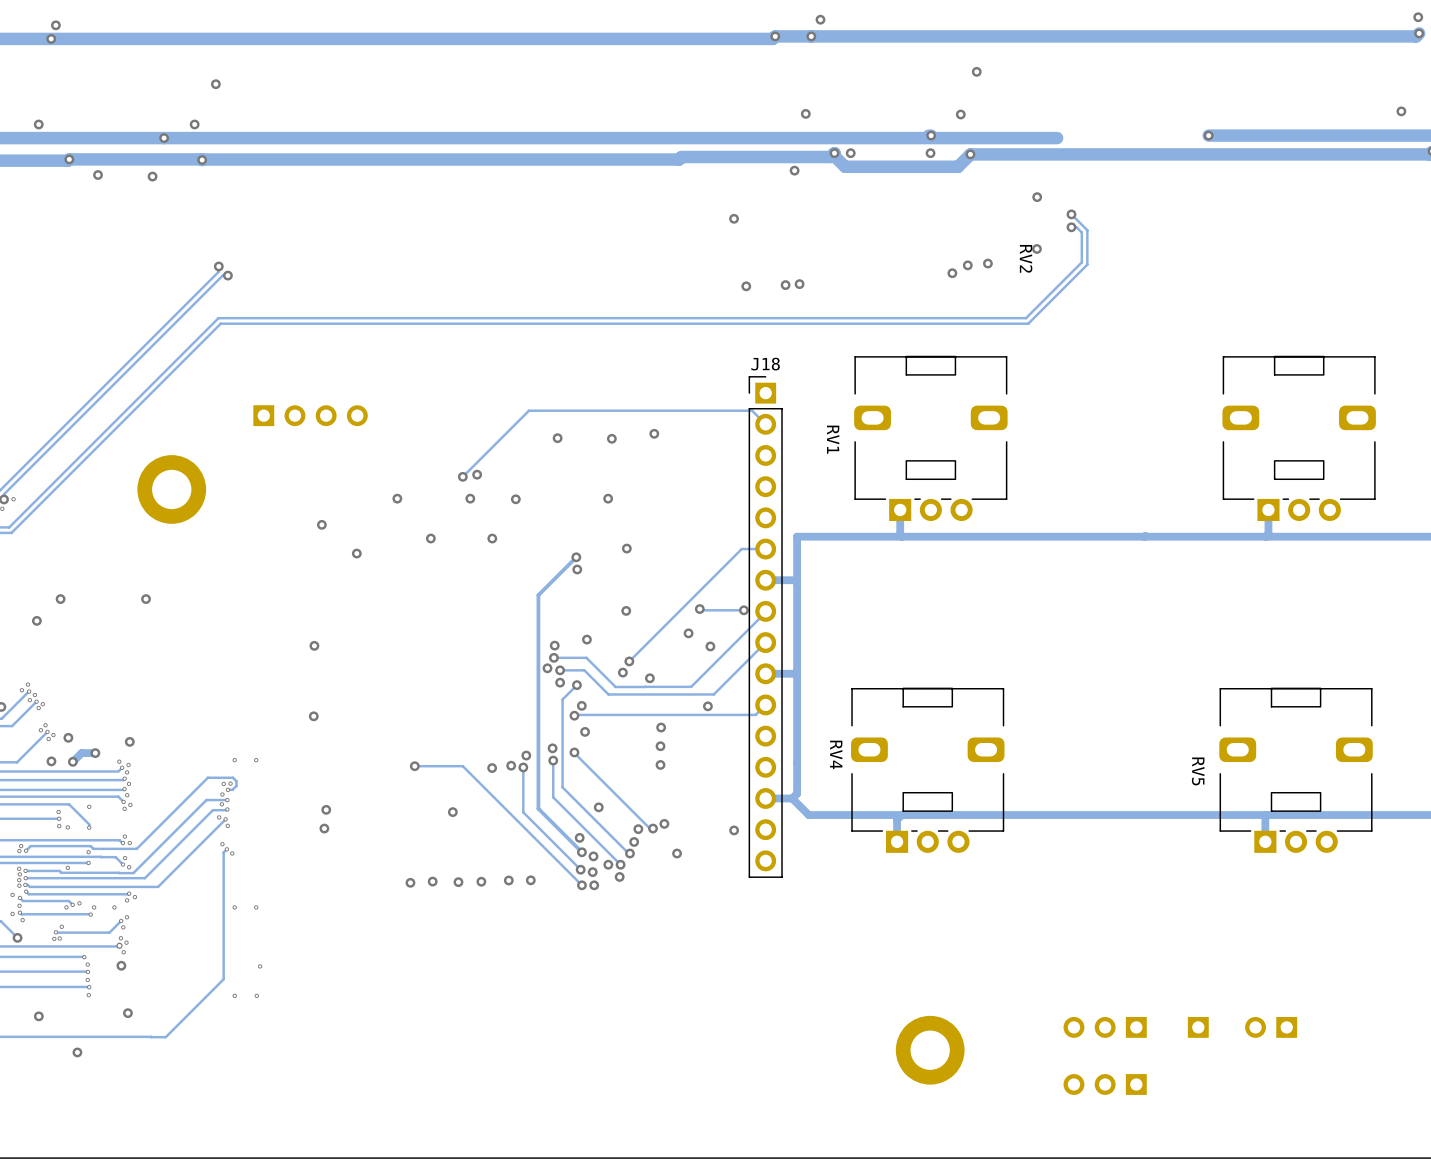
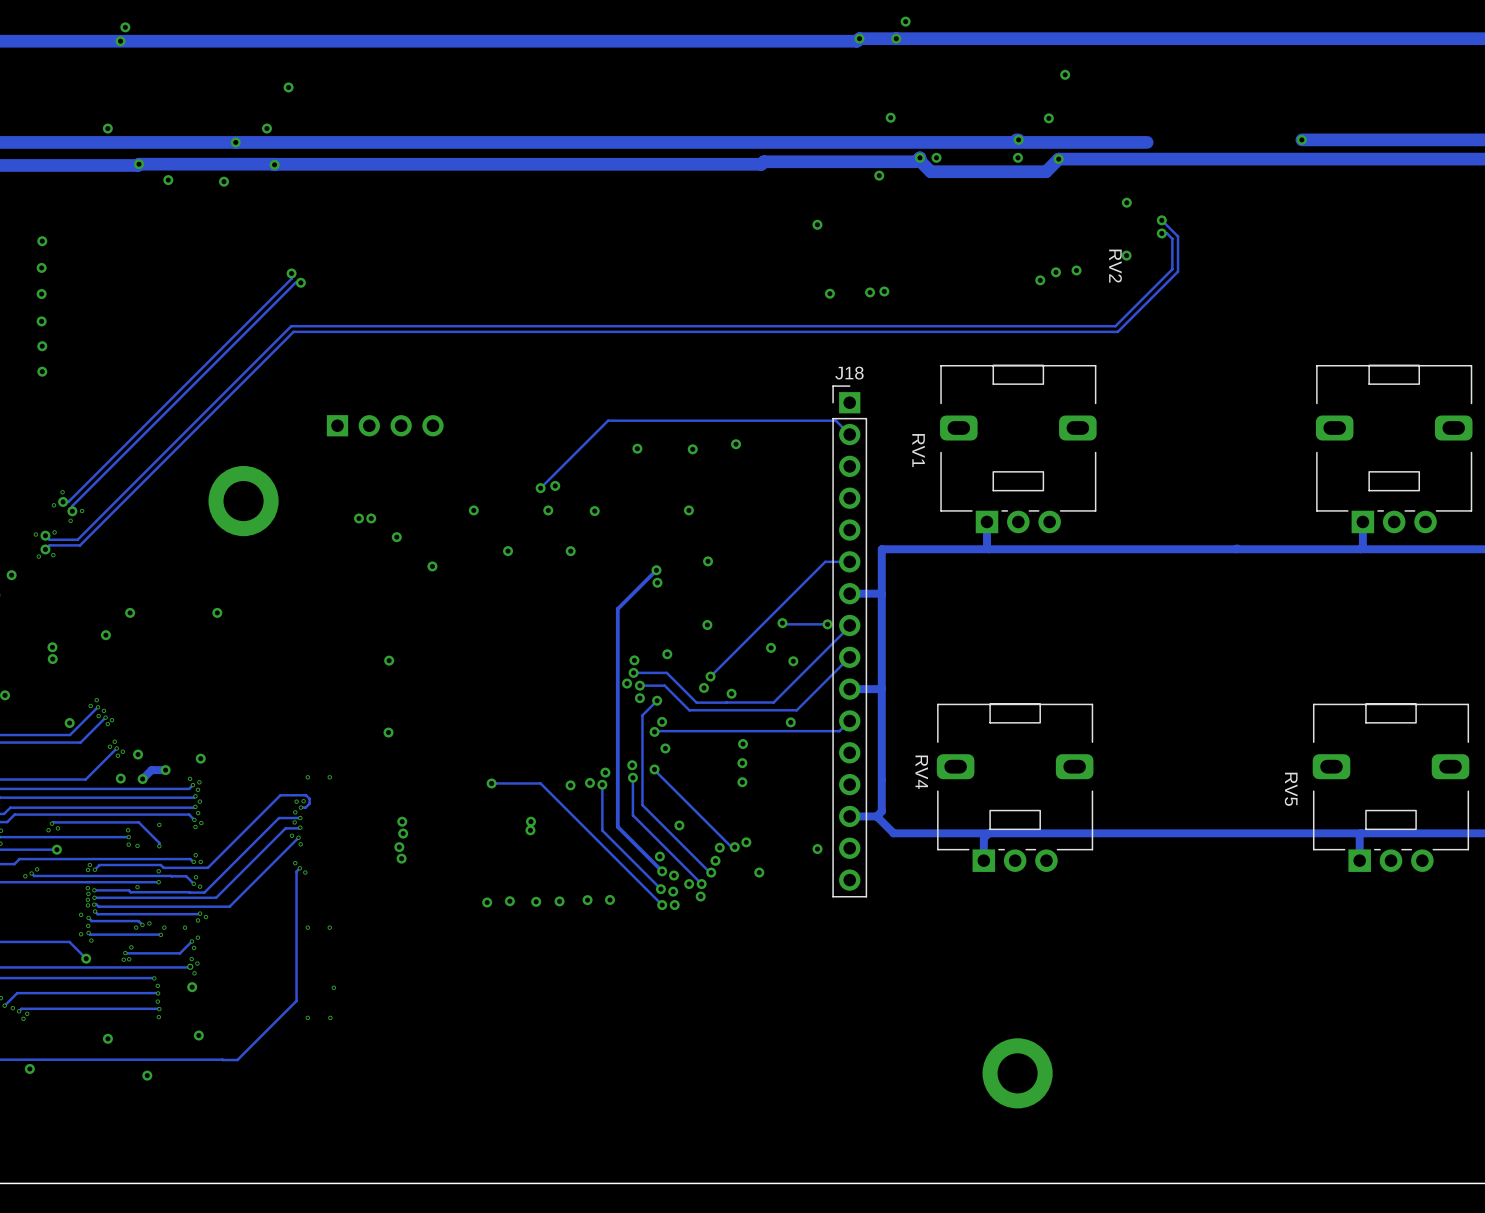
via: none -> (359, 518)
via: none -> (371, 518)
via: none -> (402, 821)
via: none -> (530, 821)
via: (326, 809) -> none
via: none -> (403, 833)
via: none -> (401, 858)
part: (1105, 1027) -> none
part: (1198, 1027) -> none
part: (1271, 1027) -> none
part: (1105, 1084) -> none

